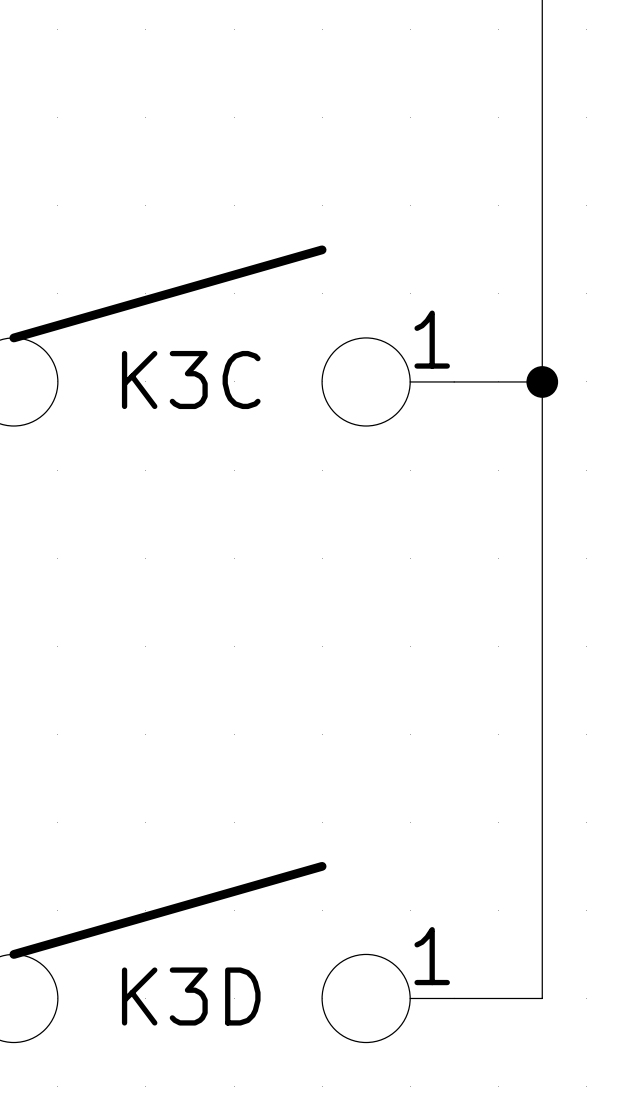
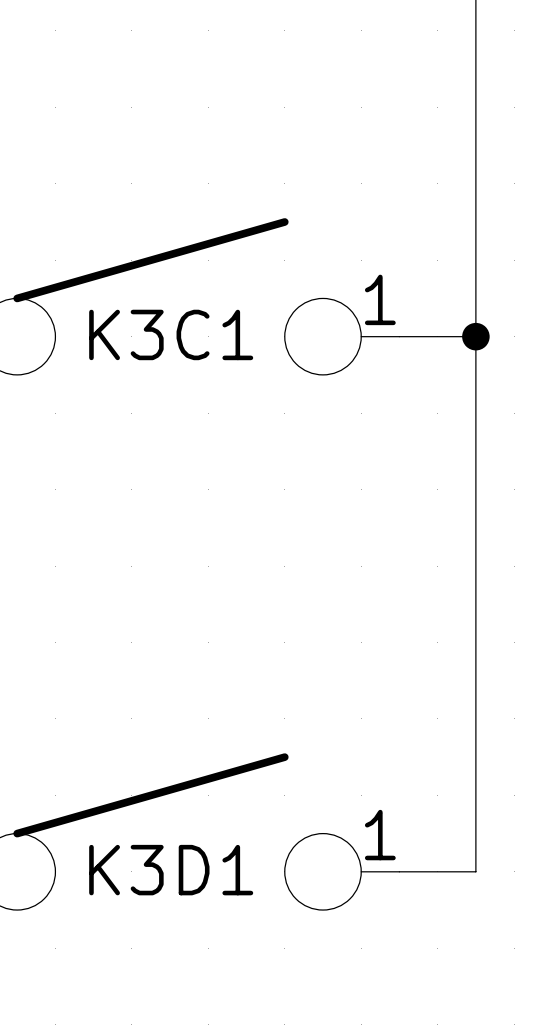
K3C name: K3C (191, 380) -> K3C1 (171, 334)
K3D name: K3D (191, 996) -> K3D1 (171, 870)

